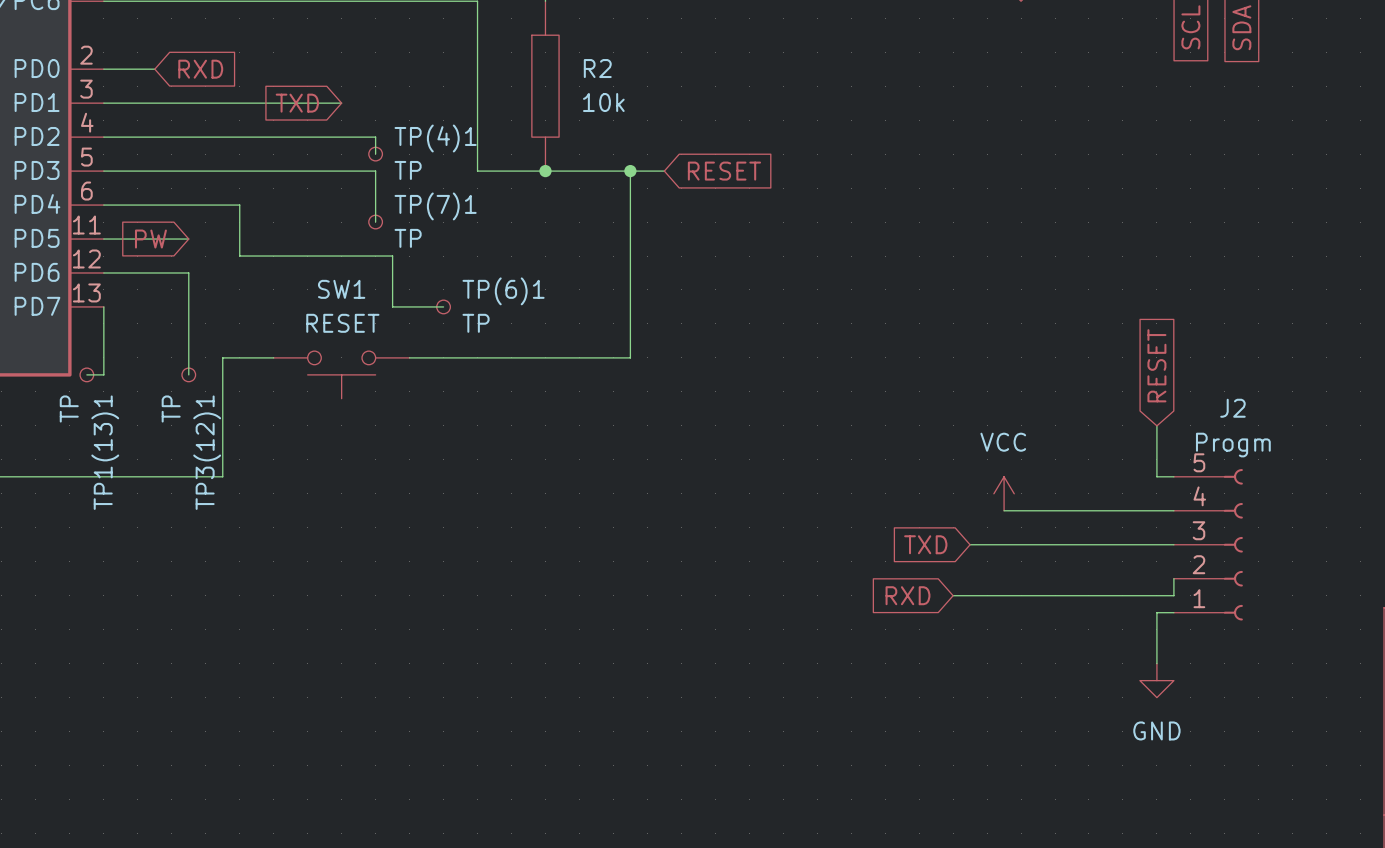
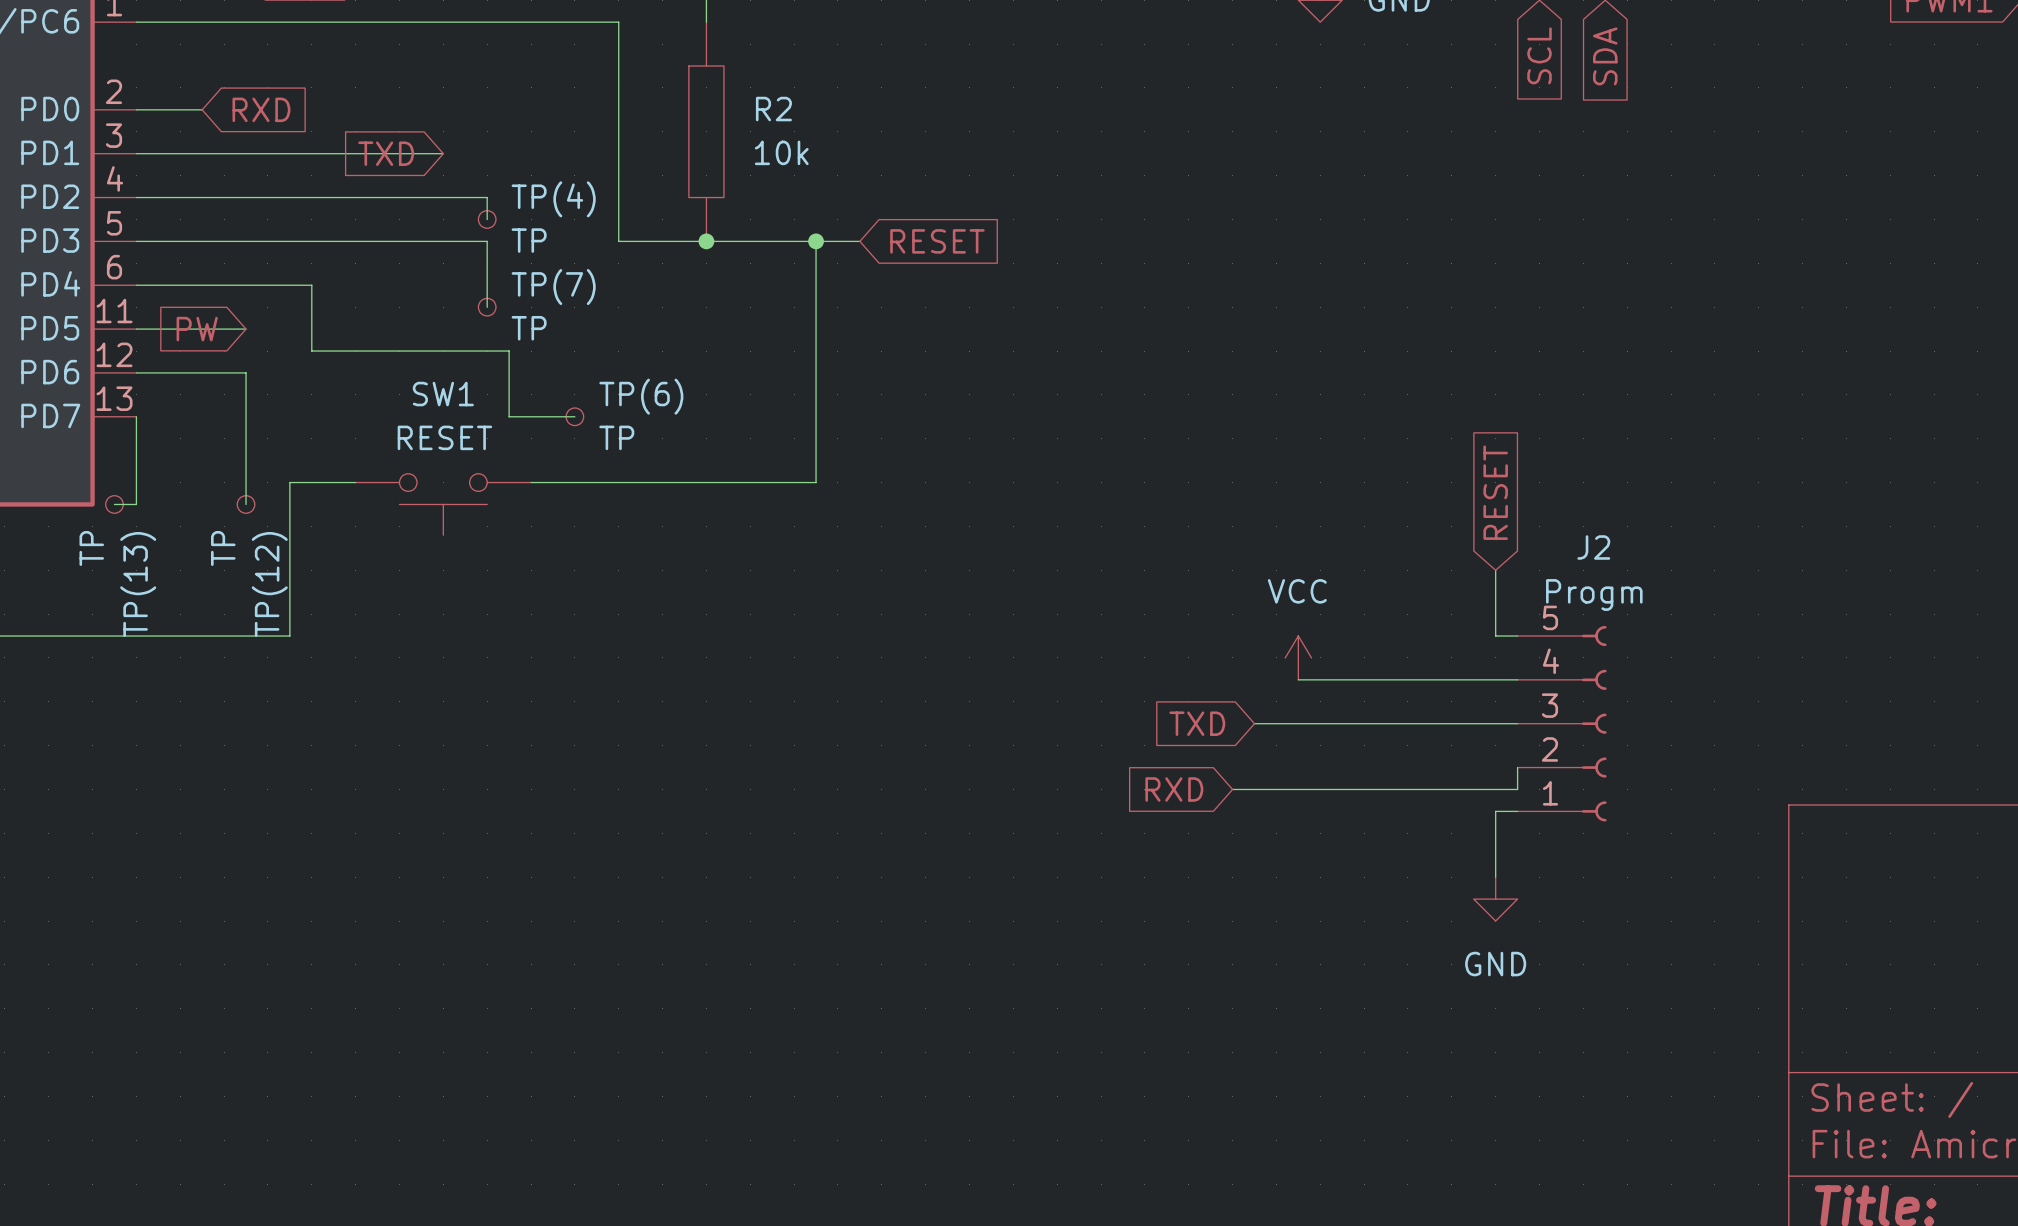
TP(4)1 name: TP(4)1 (435, 138) -> TP(4) (553, 199)
TP(7)1 name: TP(7)1 (435, 206) -> TP(7) (553, 287)
TP(6)1 name: TP(6)1 (503, 291) -> TP(6) (641, 396)
TP1(13)1 name: TP1(13)1 (105, 452) -> TP(13) (138, 584)
TP3(12)1 name: TP3(12)1 (207, 452) -> TP(12) (269, 584)

